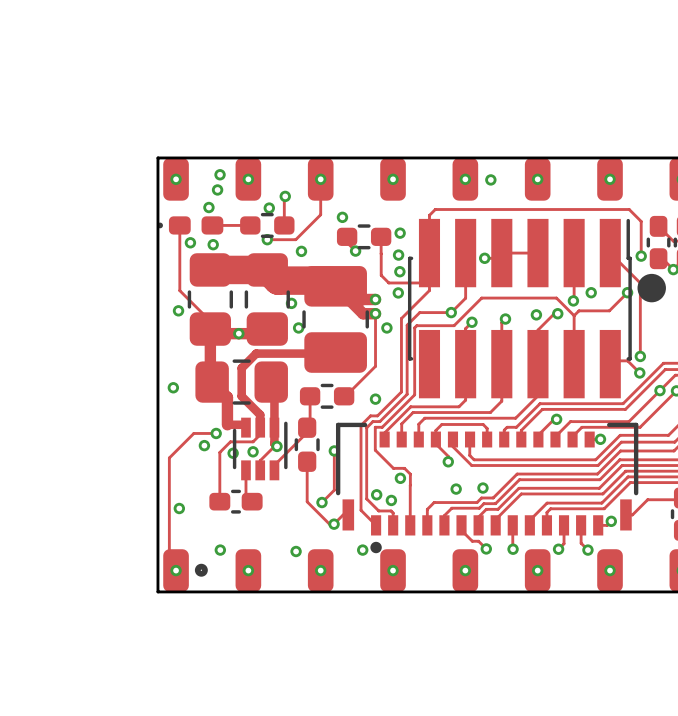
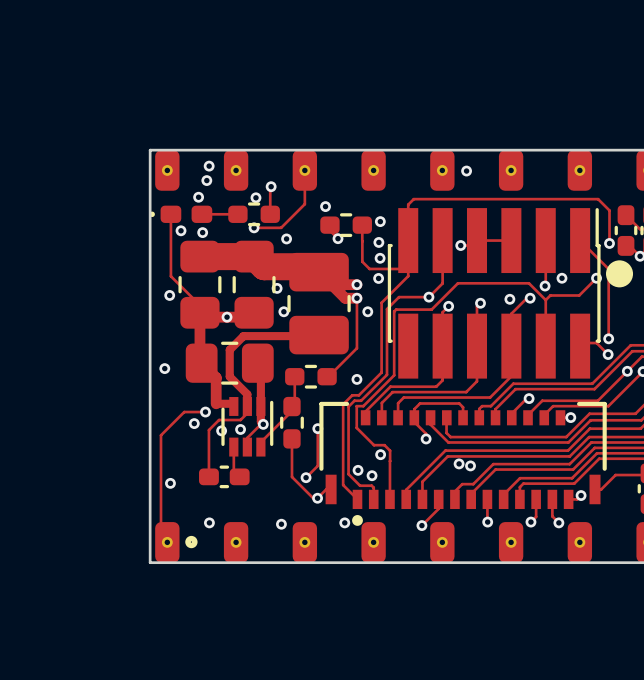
track: (517, 474) (493, 497) (481, 497) (477, 502) (434, 502) (427, 509) (427, 515) -> (491, 450) (445, 450) (406, 489)
track: (599, 479) (519, 479) (495, 503) (483, 503) (479, 508) (451, 508) (444, 515) -> (570, 456) (447, 456) (422, 481) (422, 490)
via: (456, 489) -> none
via: none -> (470, 465)
track: none -> (438, 499) (438, 508) (421, 525)
track: (461, 530) (472, 541) (478, 541) (486, 548) -> none
via: (486, 548) -> none
via: none -> (421, 525)

